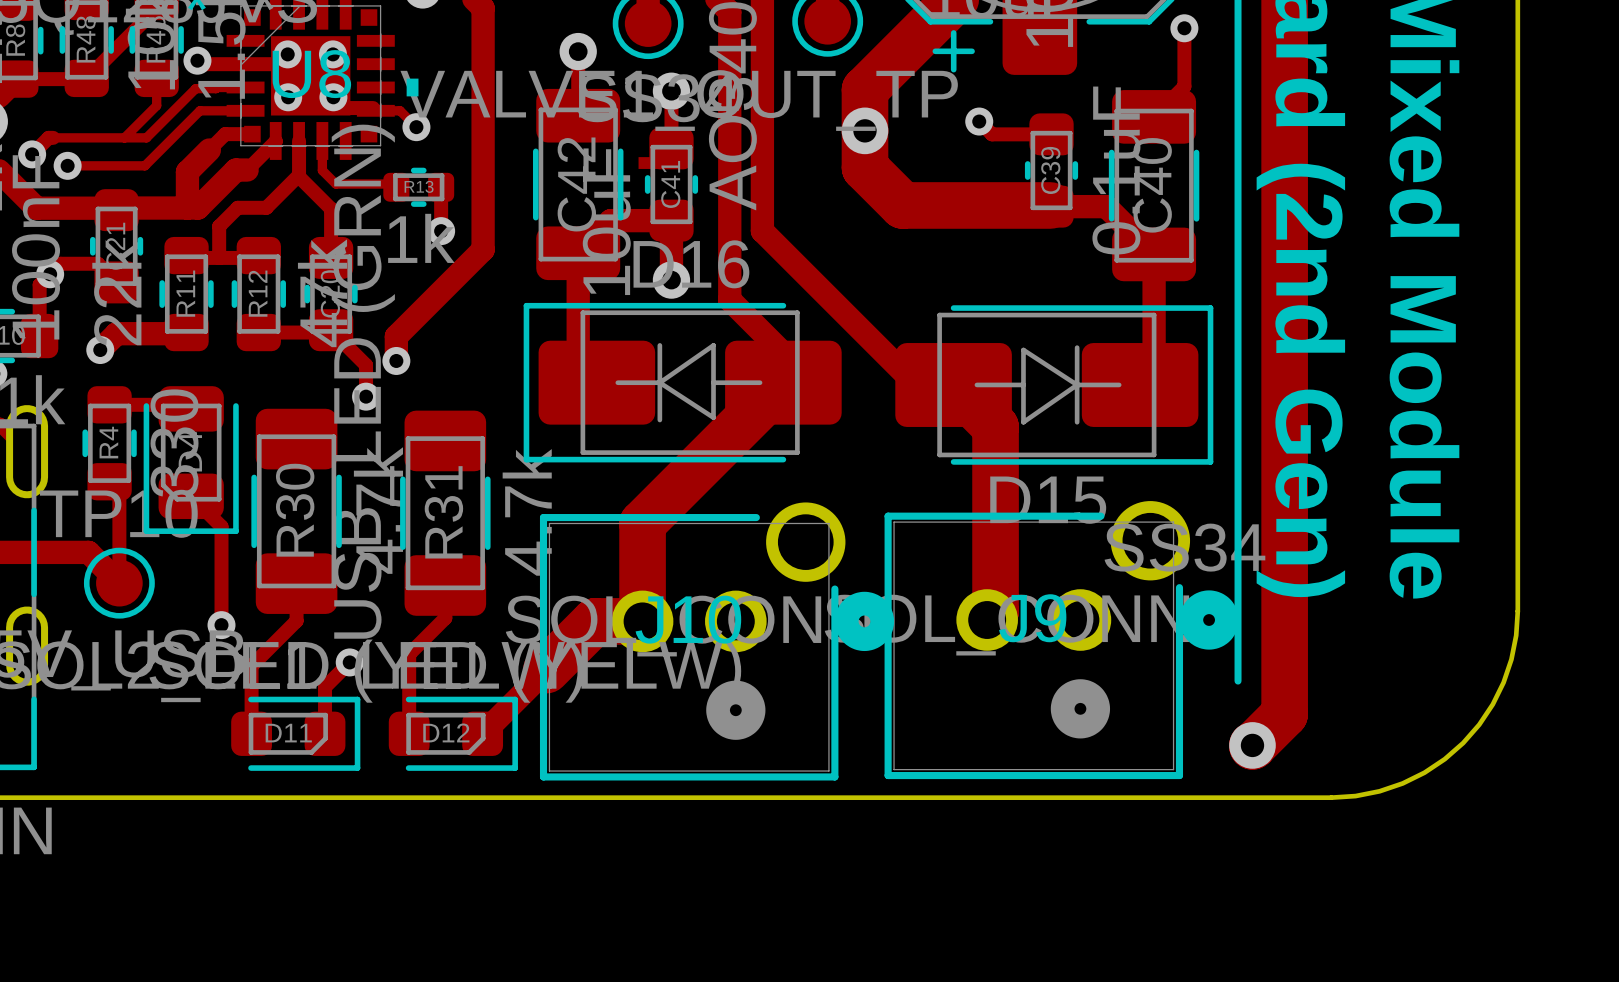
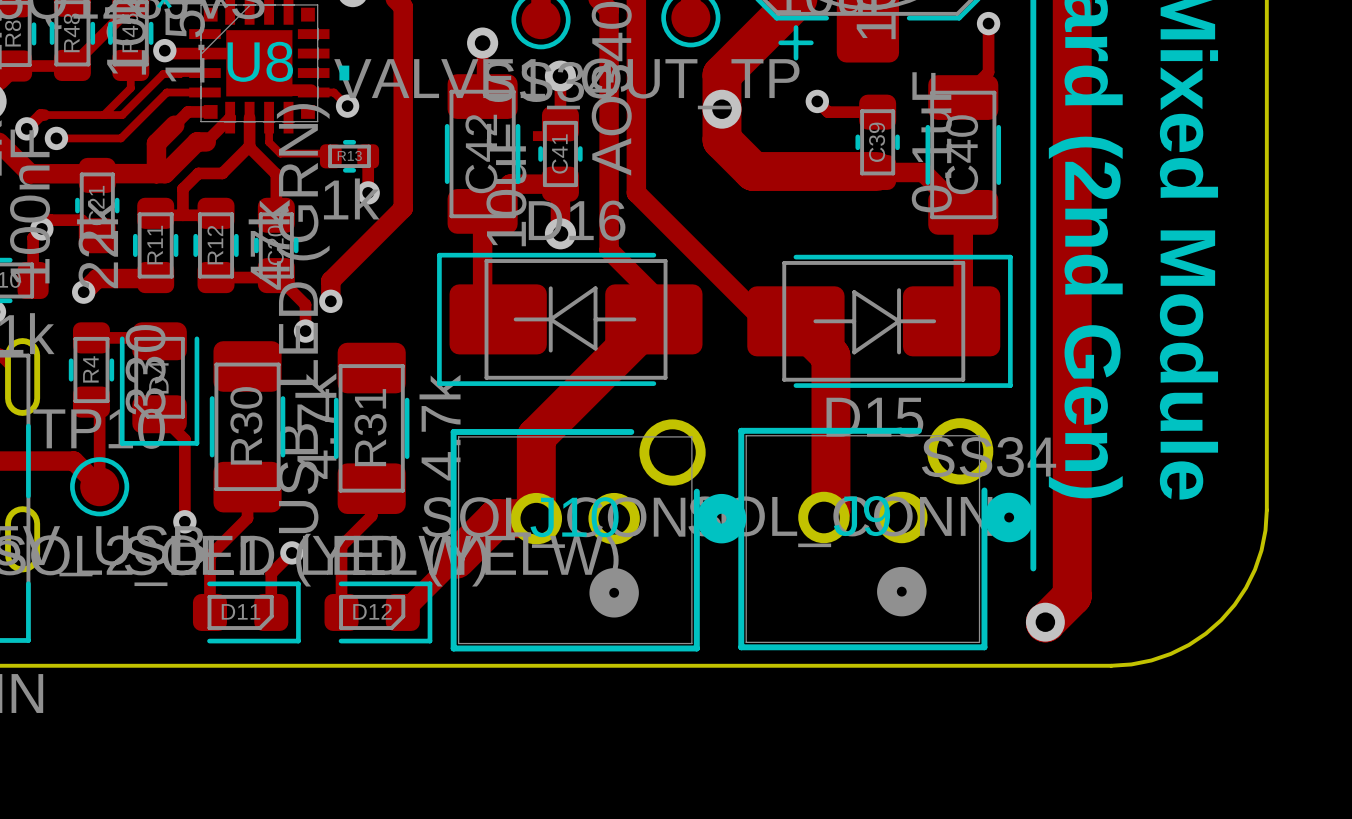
via: (287, 54) -> none
via: (332, 54) -> none
via: (288, 97) -> none
via: (333, 97) -> none

